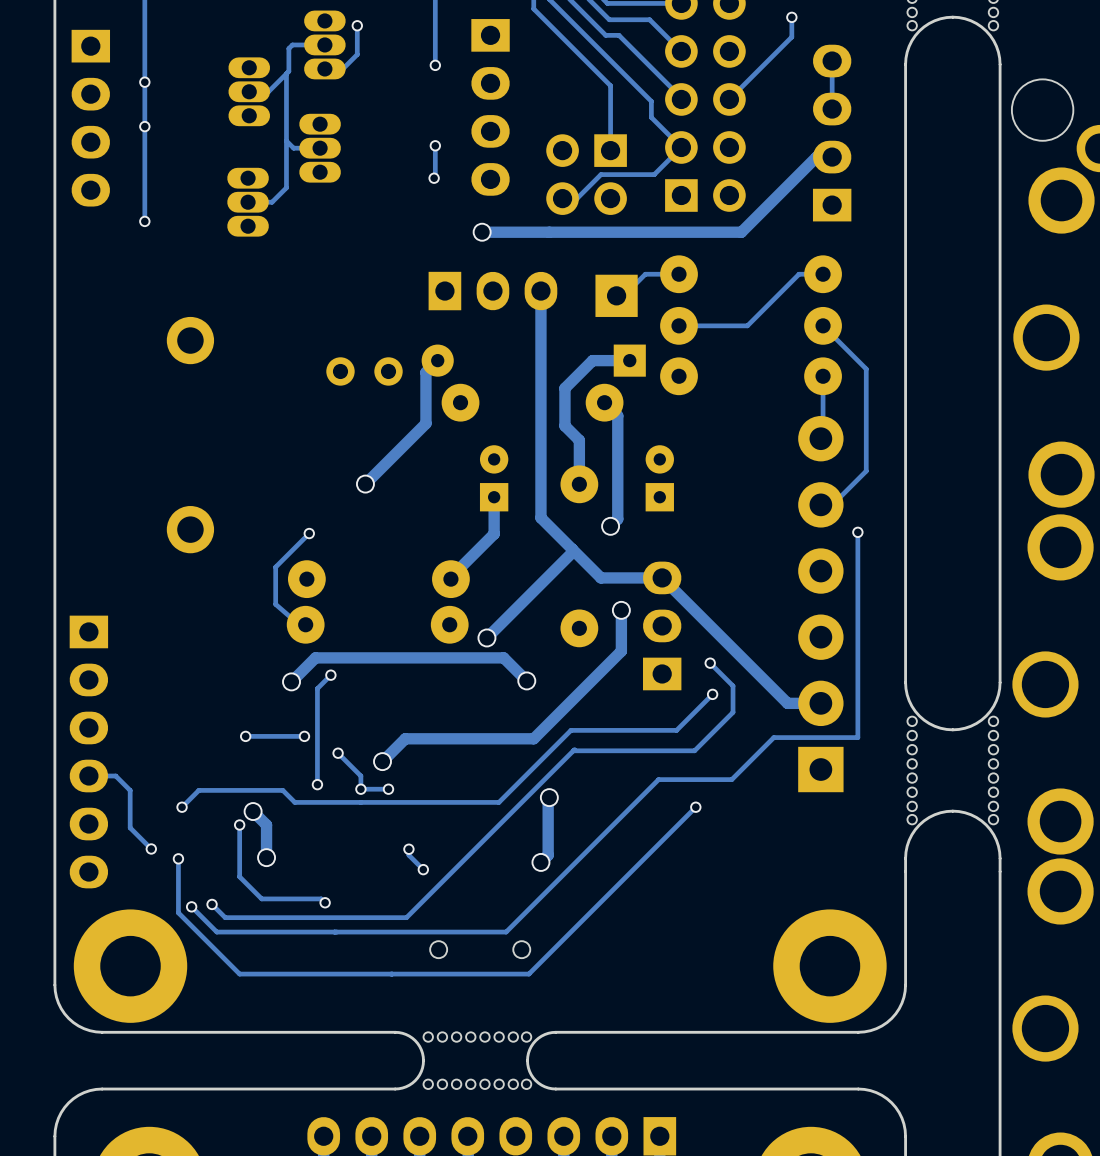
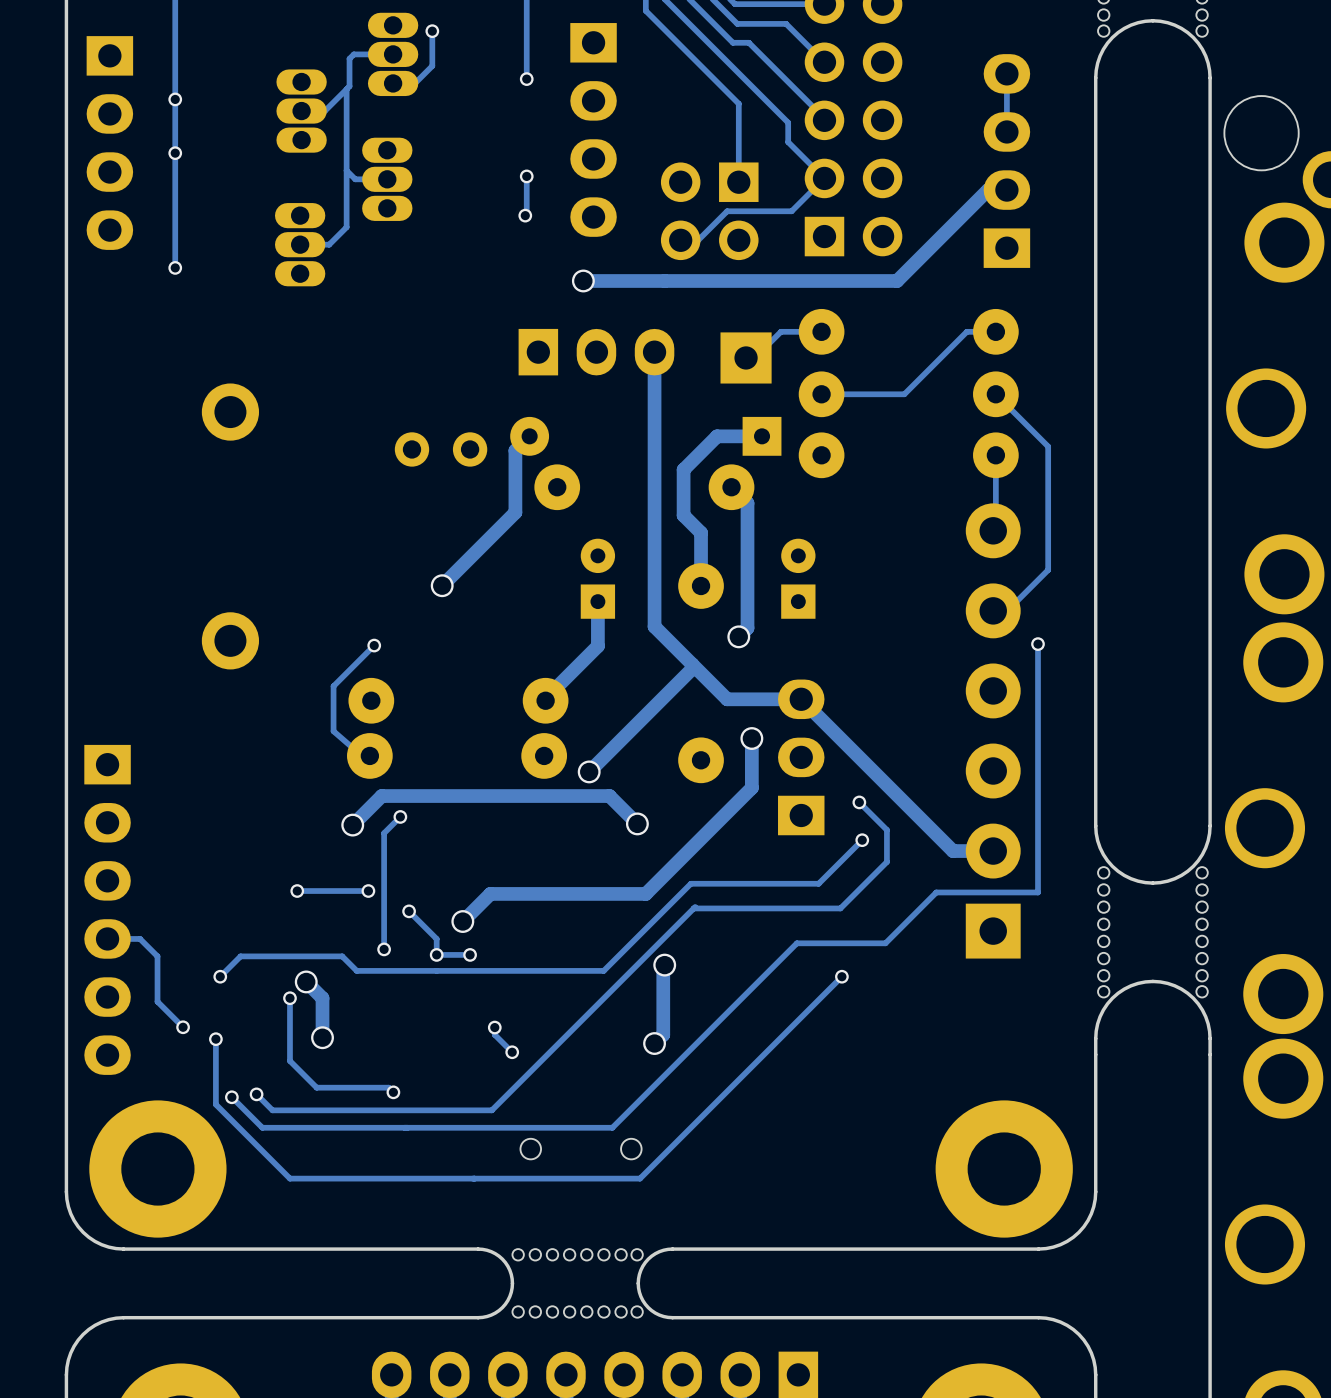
track: (791, 17) (791, 37) (729, 99) -> none
via: (791, 17) -> none

